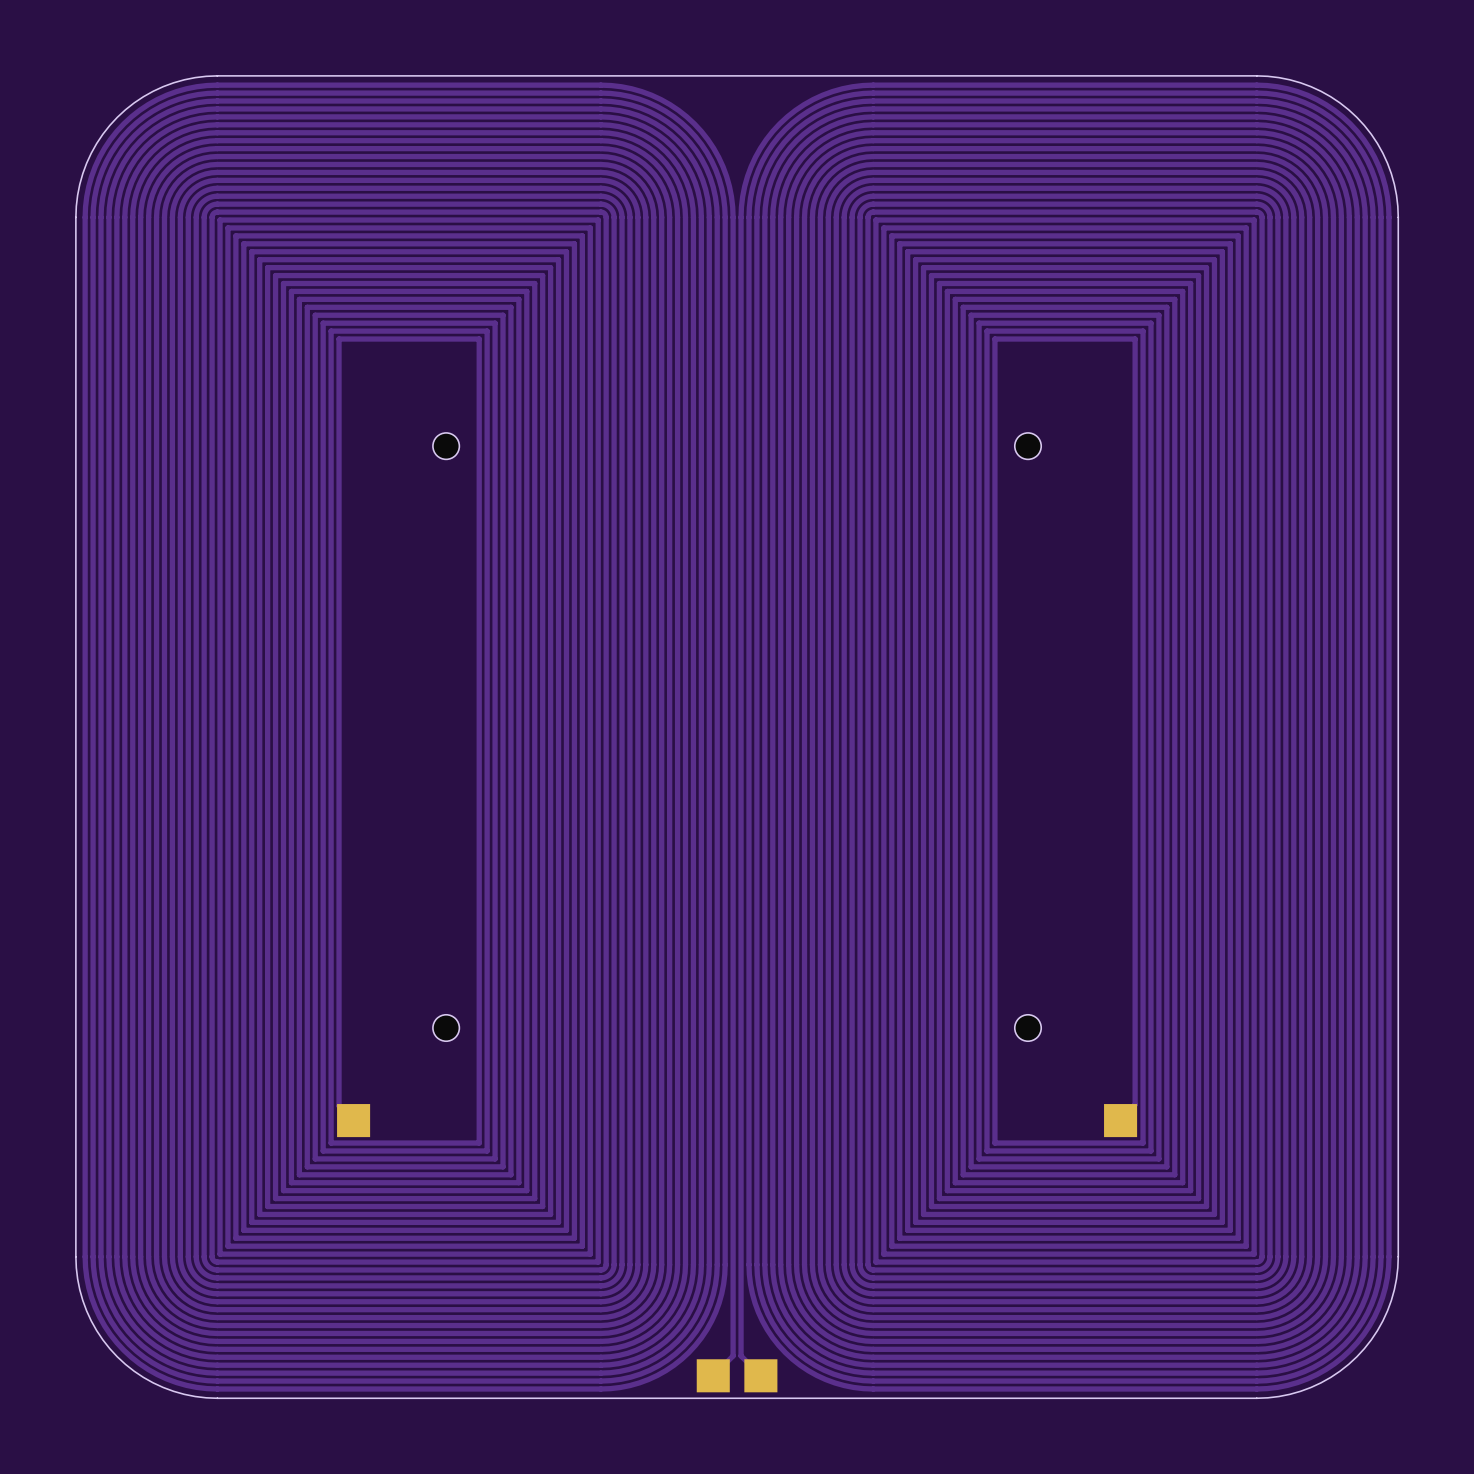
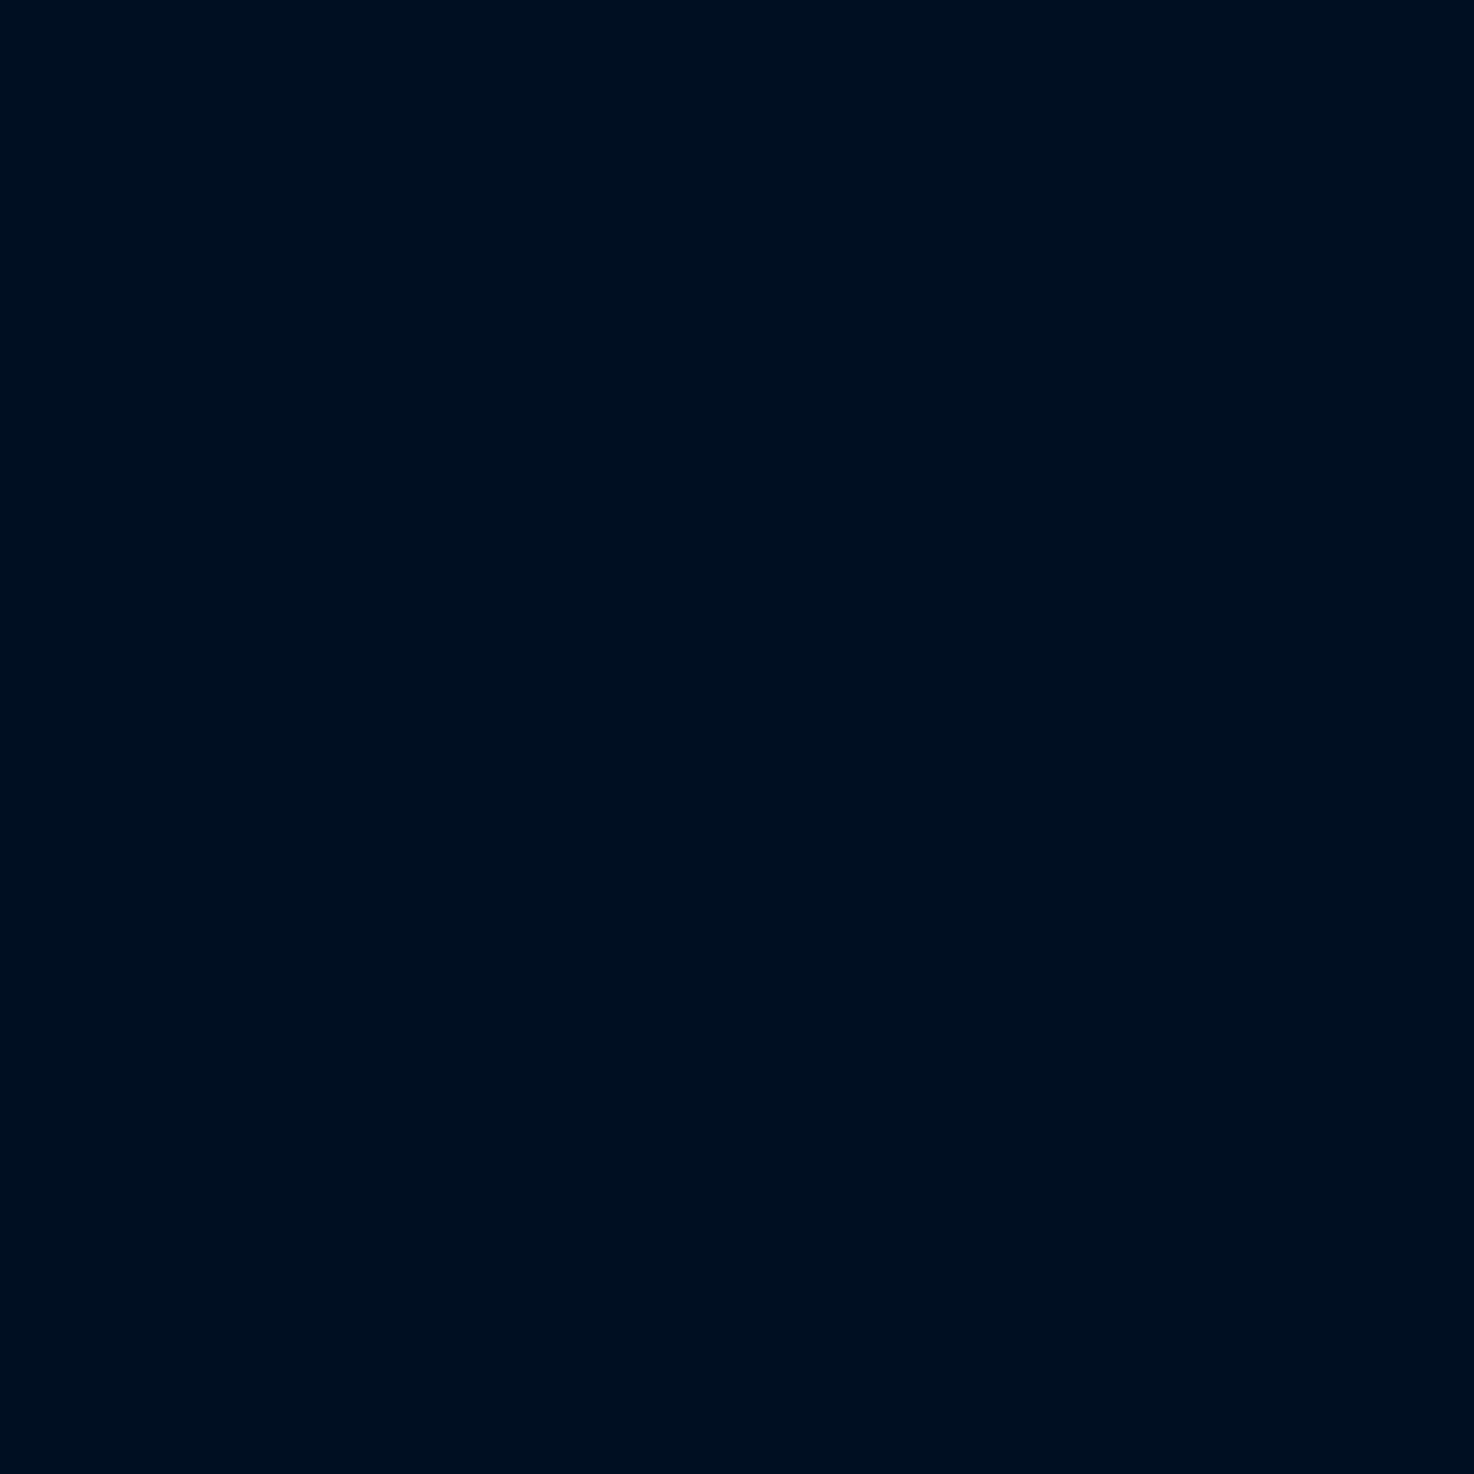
board edge: (217, 75) (1267, 76) (1289, 79) (1321, 91) (1339, 102) (1364, 125) (1382, 153) (1391, 173) (1396, 195) (1398, 217) (1398, 1256) (1394, 1289) (1382, 1321) (1364, 1348) (1348, 1364) (1330, 1377) (1300, 1391) (1278, 1396) (1256, 1398) (217, 1398) (195, 1396) (163, 1387) (134, 1371) (109, 1348) (96, 1330) (86, 1310) (79, 1289) (75, 1256) (76, 206) (79, 184) (86, 163) (96, 143) (117, 117) (143, 96) (163, 86) (184, 79) (217, 75) -> none
part: (446, 446) -> none
part: (1028, 446) -> none
part: (446, 1028) -> none
part: (1028, 1028) -> none
track: (353, 1120) (339, 1106) (339, 339) (479, 339) (479, 1143) (331, 1143) (331, 331) (487, 331) (487, 1150) (323, 1150) (323, 323) (495, 323) (495, 1158) (315, 1158) (315, 315) (503, 315) (503, 1166) (307, 1166) (307, 307) (510, 307) (510, 1174) (299, 1174) (299, 299) (518, 299) (518, 1182) (291, 1182) (291, 291) (526, 291) (526, 1190) (283, 1190) (283, 283) (534, 283) (534, 1198) (275, 1198) (275, 275) (542, 275) (542, 1206) (267, 1206) (267, 267) (550, 267) (550, 1214) (259, 1214) (259, 259) (558, 259) (558, 1222) (251, 1222) (251, 251) (566, 251) (566, 1230) (243, 1230) (243, 243) (574, 243) (574, 1238) (235, 1238) (235, 235) (582, 235) (582, 1246) (227, 1246) (227, 227) (590, 227) (590, 1254) (220, 1254) (220, 220) (598, 220) (598, 1262) (217, 1262) (213, 1260) (212, 1256) (212, 216) (217, 212) (600, 212) (606, 216) (605, 1266) (600, 1269) (217, 1269) (208, 1266) (204, 1256) (204, 214) (209, 207) (217, 204) (600, 204) (609, 207) (613, 214) (613, 1269) (609, 1275) (600, 1277) (217, 1277) (210, 1276) (202, 1271) (198, 1265) (196, 1256) (197, 210) (206, 199) (217, 196) (600, 196) (614, 200) (621, 212) (620, 1271) (614, 1281) (600, 1285) (217, 1285) (207, 1284) (196, 1277) (191, 1269) (188, 1256) (188, 217) (189, 207) (199, 194) (207, 189) (217, 188) (600, 188) (610, 189) (619, 194) (625, 201) (629, 210) (629, 1264) (628, 1274) (623, 1282) (616, 1289) (600, 1293) (217, 1293) (205, 1291) (191, 1282) (182, 1269) (180, 1256) (180, 217) (182, 205) (194, 188) (213, 180) (600, 180) (613, 182) (623, 188) (632, 197) (636, 209) (637, 1264) (635, 1276) (623, 1293) (605, 1301) (217, 1301) (200, 1298) (185, 1288) (175, 1273) (172, 1256) (172, 217) (173, 205) (178, 194) (185, 185) (200, 175) (211, 172) (600, 172) (618, 175) (628, 181) (639, 194) (644, 205) (645, 217) (645, 1264) (642, 1281) (636, 1292) (628, 1300) (612, 1308) (600, 1309) (217, 1309) (197, 1305) (179, 1294) (168, 1277) (164, 1256) (164, 217) (166, 203) (171, 190) (185, 175) (197, 168) (210, 164) (600, 164) (621, 168) (633, 175) (642, 185) (651, 203) (653, 217) (653, 1264) (649, 1284) (642, 1296) (633, 1306) (621, 1313) (607, 1317) (217, 1317) (203, 1316) (190, 1311) (174, 1299) (162, 1283) (158, 1270) (156, 1256) (156, 217) (159, 197) (169, 179) (179, 169) (190, 162) (210, 156) (600, 156) (620, 159) (638, 169) (652, 185) (660, 203) (661, 217) (661, 1264) (658, 1284) (648, 1302) (638, 1312) (627, 1319) (607, 1325) (217, 1325) (194, 1321) (174, 1310) (159, 1293) (152, 1279) (149, 1264) (148, 217) (152, 194) (159, 180) (174, 163) (187, 155) (209, 149) (600, 148) (623, 152) (643, 163) (659, 180) (667, 202) (669, 217) (669, 1264) (665, 1287) (659, 1301) (643, 1318) (630, 1326) (608, 1333) (217, 1333) (195, 1330) (168, 1316) (149, 1292) (141, 1264) (140, 217) (143, 195) (153, 174) (168, 158) (188, 146) (209, 141) (600, 140) (623, 143) (649, 158) (664, 174) (676, 202) (677, 1264) (671, 1294) (660, 1313) (643, 1328) (630, 1335) (608, 1341) (217, 1341) (200, 1339) (184, 1334) (170, 1327) (157, 1316) (147, 1303) (139, 1289) (133, 1265) (132, 217) (134, 200) (139, 184) (151, 163) (163, 151) (184, 139) (209, 133) (600, 132) (625, 136) (640, 142) (654, 151) (671, 170) (679, 184) (683, 200) (685, 217) (685, 1264) (683, 1281) (679, 1297) (671, 1311) (654, 1330) (633, 1342) (609, 1348) (217, 1349) (190, 1345) (173, 1338) (158, 1328) (145, 1315) (135, 1300) (128, 1283) (125, 1265) (124, 217) (126, 199) (131, 181) (140, 165) (158, 145) (181, 131) (208, 125) (600, 124) (618, 126) (636, 131) (659, 145) (677, 165) (686, 181) (691, 199) (693, 217) (693, 1264) (691, 1282) (686, 1300) (672, 1323) (652, 1341) (627, 1353) (609, 1356) (217, 1357) (199, 1355) (183, 1351) (167, 1343) (152, 1333) (140, 1321) (130, 1307) (120, 1282) (117, 1265) (116, 217) (118, 199) (122, 183) (135, 159) (152, 140) (174, 126) (199, 118) (600, 116) (626, 120) (643, 126) (658, 135) (671, 146) (683, 159) (691, 174) (697, 191) (701, 217) (701, 1264) (699, 1282) (695, 1299) (683, 1322) (665, 1341) (643, 1355) (618, 1363) (217, 1365) (189, 1361) (171, 1355) (155, 1345) (140, 1333) (128, 1318) (119, 1302) (112, 1284) (109, 1266) (108, 217) (110, 198) (115, 180) (128, 155) (147, 134) (171, 119) (198, 110) (217, 108) (600, 108) (619, 110) (637, 115) (655, 123) (670, 134) (683, 147) (694, 163) (705, 189) (709, 217) (709, 1264) (707, 1283) (702, 1301) (689, 1326) (670, 1347) (646, 1362) (619, 1371) (600, 1373) (217, 1373) (197, 1371) (177, 1366) (159, 1357) (142, 1345) (128, 1331) (111, 1305) (104, 1286) (101, 1266) (101, 217) (102, 197) (108, 177) (122, 150) (142, 128) (168, 111) (197, 102) (217, 101) (600, 101) (630, 104) (650, 111) (667, 122) (683, 135) (696, 150) (706, 168) (713, 187) (717, 217) (717, 1264) (715, 1284) (706, 1313) (690, 1339) (675, 1353) (650, 1370) (621, 1379) (600, 1381) (217, 1381) (197, 1379) (178, 1374) (160, 1367) (136, 1351) (122, 1337) (106, 1313) (96, 1285) (93, 1266) (93, 217) (94, 197) (102, 169) (116, 144) (136, 122) (160, 106) (178, 99) (197, 94) (600, 93) (620, 94) (639, 99) (657, 106) (673, 116) (688, 129) (701, 144) (711, 160) (719, 178) (723, 197) (725, 217) (724, 1274) (721, 1293) (711, 1321) (701, 1337) (688, 1352) (673, 1365) (648, 1379) (629, 1385) (600, 1389) (217, 1389) (196, 1387) (176, 1382) (157, 1374) (131, 1357) (110, 1334) (95, 1307) (86, 1277) (85, 1256) (85, 217) (88, 186) (95, 166) (104, 148) (116, 131) (131, 116) (148, 104) (166, 95) (196, 86) (217, 85) (600, 85) (631, 88) (651, 95) (669, 104) (686, 116) (701, 131) (713, 148) (723, 166) (729, 186) (732, 207) (733, 1355) (713, 1375) -> none
part: (353, 1120) -> none
track: (1119, 1120) (1135, 1104) (1135, 339) (994, 339) (994, 1143) (1143, 1143) (1143, 331) (987, 331) (987, 1150) (1150, 1150) (1150, 323) (979, 323) (979, 1158) (1158, 1158) (1158, 315) (971, 315) (971, 1166) (1166, 1166) (1166, 307) (963, 307) (963, 1174) (1174, 1174) (1174, 299) (955, 299) (955, 1182) (1182, 1182) (1182, 291) (947, 291) (947, 1190) (1190, 1190) (1190, 283) (939, 283) (939, 1198) (1198, 1198) (1198, 275) (931, 275) (931, 1206) (1206, 1206) (1206, 267) (923, 267) (923, 1214) (1214, 1214) (1214, 259) (915, 259) (915, 1222) (1222, 1222) (1222, 251) (907, 251) (907, 1230) (1230, 1230) (1230, 243) (899, 243) (899, 1238) (1238, 1238) (1238, 235) (891, 235) (891, 1246) (1246, 1246) (1246, 227) (883, 227) (883, 1254) (1254, 1254) (1254, 220) (875, 220) (875, 1262) (1256, 1262) (1260, 1260) (1262, 1256) (1261, 216) (1256, 212) (873, 212) (868, 216) (868, 1266) (873, 1269) (1256, 1269) (1266, 1266) (1269, 1256) (1269, 214) (1265, 207) (1256, 204) (873, 204) (865, 207) (860, 214) (860, 1269) (865, 1275) (873, 1277) (1256, 1277) (1263, 1276) (1271, 1271) (1276, 1263) (1277, 1256) (1276, 210) (1269, 200) (1256, 196) (873, 196) (860, 200) (852, 212) (853, 1271) (860, 1281) (873, 1285) (1256, 1285) (1269, 1282) (1277, 1277) (1282, 1269) (1285, 1256) (1285, 217) (1284, 207) (1274, 194) (1266, 189) (1256, 188) (873, 188) (863, 189) (855, 194) (848, 201) (844, 210) (844, 1264) (845, 1274) (855, 1287) (863, 1292) (873, 1293) (1256, 1293) (1269, 1291) (1282, 1282) (1291, 1269) (1293, 1256) (1293, 217) (1291, 205) (1279, 188) (1260, 180) (873, 180) (861, 182) (850, 188) (841, 197) (837, 209) (836, 1264) (838, 1276) (850, 1293) (869, 1301) (1256, 1301) (1273, 1298) (1288, 1288) (1298, 1273) (1301, 1256) (1301, 217) (1300, 205) (1292, 190) (1284, 181) (1273, 175) (1262, 172) (873, 172) (856, 175) (845, 181) (837, 190) (829, 205) (828, 217) (828, 1264) (831, 1281) (837, 1292) (845, 1300) (861, 1308) (873, 1309) (1256, 1309) (1277, 1305) (1294, 1294) (1305, 1277) (1309, 1256) (1309, 217) (1307, 203) (1302, 190) (1294, 179) (1277, 168) (1263, 164) (873, 164) (853, 168) (841, 175) (831, 185) (822, 203) (820, 217) (820, 1264) (824, 1284) (831, 1296) (841, 1306) (853, 1313) (866, 1317) (1256, 1317) (1276, 1314) (1289, 1308) (1299, 1299) (1308, 1289) (1314, 1276) (1317, 1256) (1317, 217) (1314, 197) (1308, 185) (1294, 169) (1283, 162) (1263, 156) (873, 156) (853, 159) (835, 169) (821, 185) (813, 203) (812, 217) (812, 1264) (815, 1284) (825, 1302) (835, 1312) (853, 1322) (866, 1325) (1256, 1325) (1272, 1323) (1286, 1318) (1305, 1305) (1318, 1286) (1325, 1264) (1325, 217) (1321, 194) (1315, 180) (1299, 163) (1279, 152) (1264, 149) (873, 148) (850, 152) (830, 163) (815, 180) (806, 202) (804, 217) (804, 1264) (808, 1287) (819, 1307) (830, 1318) (850, 1329) (865, 1333) (1256, 1333) (1286, 1327) (1311, 1311) (1324, 1292) (1333, 1264) (1333, 217) (1330, 195) (1320, 174) (1305, 158) (1286, 146) (1264, 141) (873, 140) (851, 143) (824, 158) (809, 174) (798, 202) (796, 1264) (802, 1294) (813, 1313) (824, 1323) (843, 1335) (865, 1341) (1256, 1341) (1281, 1337) (1296, 1331) (1310, 1322) (1322, 1310) (1331, 1296) (1337, 1281) (1341, 1265) (1341, 217) (1337, 192) (1327, 170) (1310, 151) (1289, 139) (1265, 133) (873, 132) (856, 134) (840, 139) (819, 151) (802, 170) (795, 184) (790, 200) (788, 217) (788, 1264) (790, 1281) (795, 1297) (807, 1318) (819, 1330) (840, 1342) (864, 1348) (1256, 1349) (1283, 1345) (1300, 1338) (1315, 1328) (1328, 1315) (1338, 1300) (1345, 1283) (1348, 1265) (1349, 217) (1347, 199) (1342, 181) (1328, 158) (1308, 140) (1292, 131) (1265, 125) (873, 124) (846, 128) (829, 135) (814, 145) (801, 158) (791, 173) (782, 199) (780, 217) (780, 1264) (782, 1282) (787, 1300) (801, 1323) (814, 1336) (837, 1350) (864, 1356) (1256, 1357) (1274, 1355) (1291, 1351) (1307, 1343) (1321, 1333) (1333, 1321) (1343, 1307) (1353, 1282) (1356, 1265) (1357, 217) (1355, 199) (1351, 183) (1339, 159) (1321, 140) (1299, 126) (1274, 118) (873, 116) (855, 118) (838, 122) (823, 130) (808, 140) (790, 159) (782, 174) (776, 191) (772, 217) (772, 1264) (774, 1282) (778, 1299) (790, 1322) (808, 1341) (830, 1355) (855, 1363) (1256, 1365) (1275, 1363) (1293, 1358) (1310, 1350) (1326, 1339) (1339, 1326) (1350, 1310) (1361, 1284) (1364, 1266) (1365, 217) (1363, 198) (1358, 180) (1345, 155) (1326, 134) (1302, 119) (1275, 110) (1256, 108) (873, 108) (845, 112) (827, 119) (811, 128) (796, 140) (784, 155) (775, 171) (768, 189) (764, 217) (764, 1264) (766, 1283) (771, 1301) (784, 1326) (803, 1347) (827, 1362) (854, 1371) (873, 1373) (1256, 1373) (1276, 1371) (1296, 1366) (1314, 1357) (1331, 1345) (1345, 1331) (1357, 1314) (1369, 1286) (1372, 1266) (1373, 217) (1371, 197) (1366, 177) (1352, 150) (1331, 128) (1305, 111) (1276, 102) (1256, 101) (873, 101) (853, 102) (833, 108) (815, 116) (798, 128) (784, 142) (772, 159) (760, 187) (756, 217) (756, 1264) (758, 1284) (767, 1313) (777, 1331) (798, 1353) (824, 1370) (853, 1379) (873, 1381) (1256, 1381) (1285, 1377) (1304, 1371) (1321, 1362) (1337, 1351) (1357, 1329) (1367, 1313) (1374, 1295) (1380, 1266) (1381, 217) (1377, 188) (1371, 169) (1362, 152) (1351, 136) (1329, 116) (1304, 102) (1276, 94) (873, 93) (853, 94) (834, 99) (816, 106) (800, 116) (785, 129) (772, 144) (762, 160) (755, 178) (750, 197) (748, 217) (749, 1274) (752, 1293) (762, 1321) (778, 1345) (792, 1359) (808, 1370) (825, 1379) (844, 1385) (873, 1389) (1256, 1389) (1277, 1387) (1297, 1382) (1316, 1374) (1342, 1357) (1363, 1334) (1378, 1307) (1385, 1287) (1389, 1256) (1389, 217) (1385, 186) (1378, 166) (1369, 148) (1357, 131) (1342, 116) (1325, 104) (1307, 95) (1277, 86) (1256, 85) (873, 85) (842, 88) (822, 95) (804, 104) (787, 116) (772, 131) (760, 148) (751, 166) (744, 186) (741, 207) (741, 1355) (760, 1375) -> none
part: (1120, 1120) -> none
part: (713, 1375) -> none
part: (760, 1375) -> none

